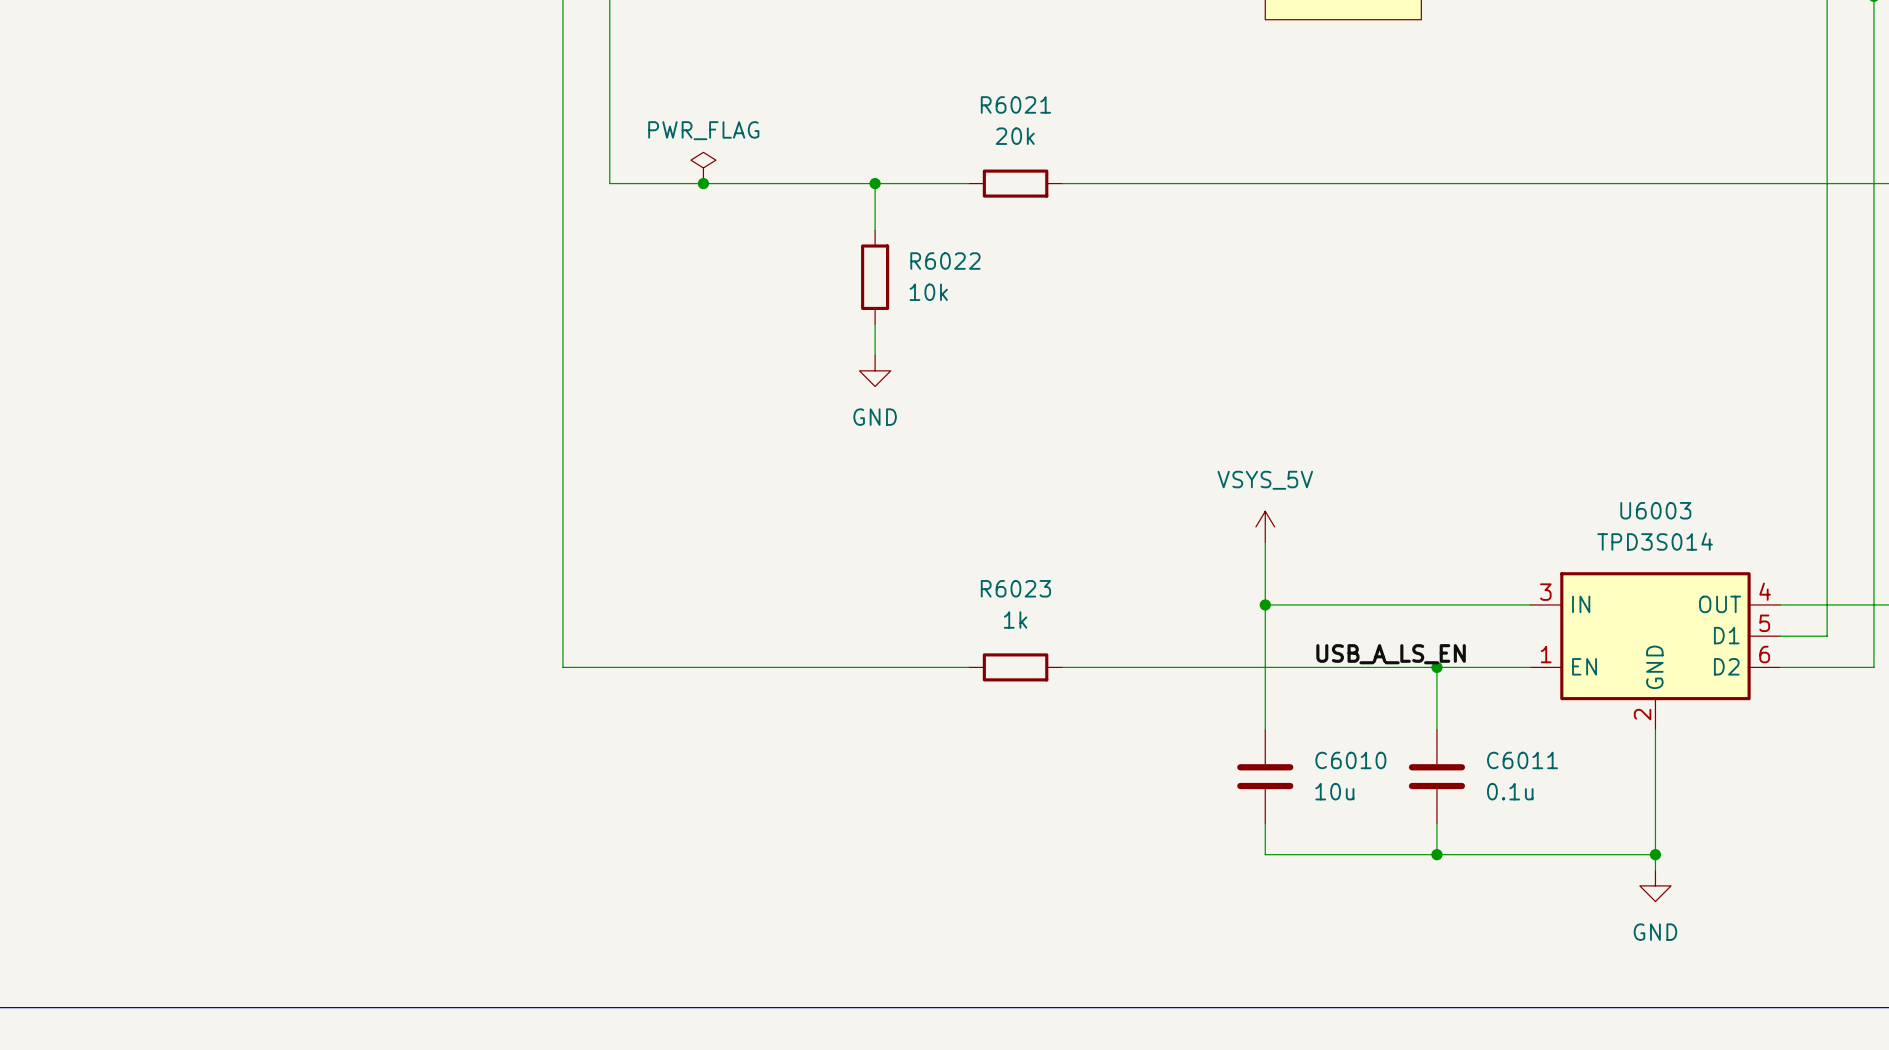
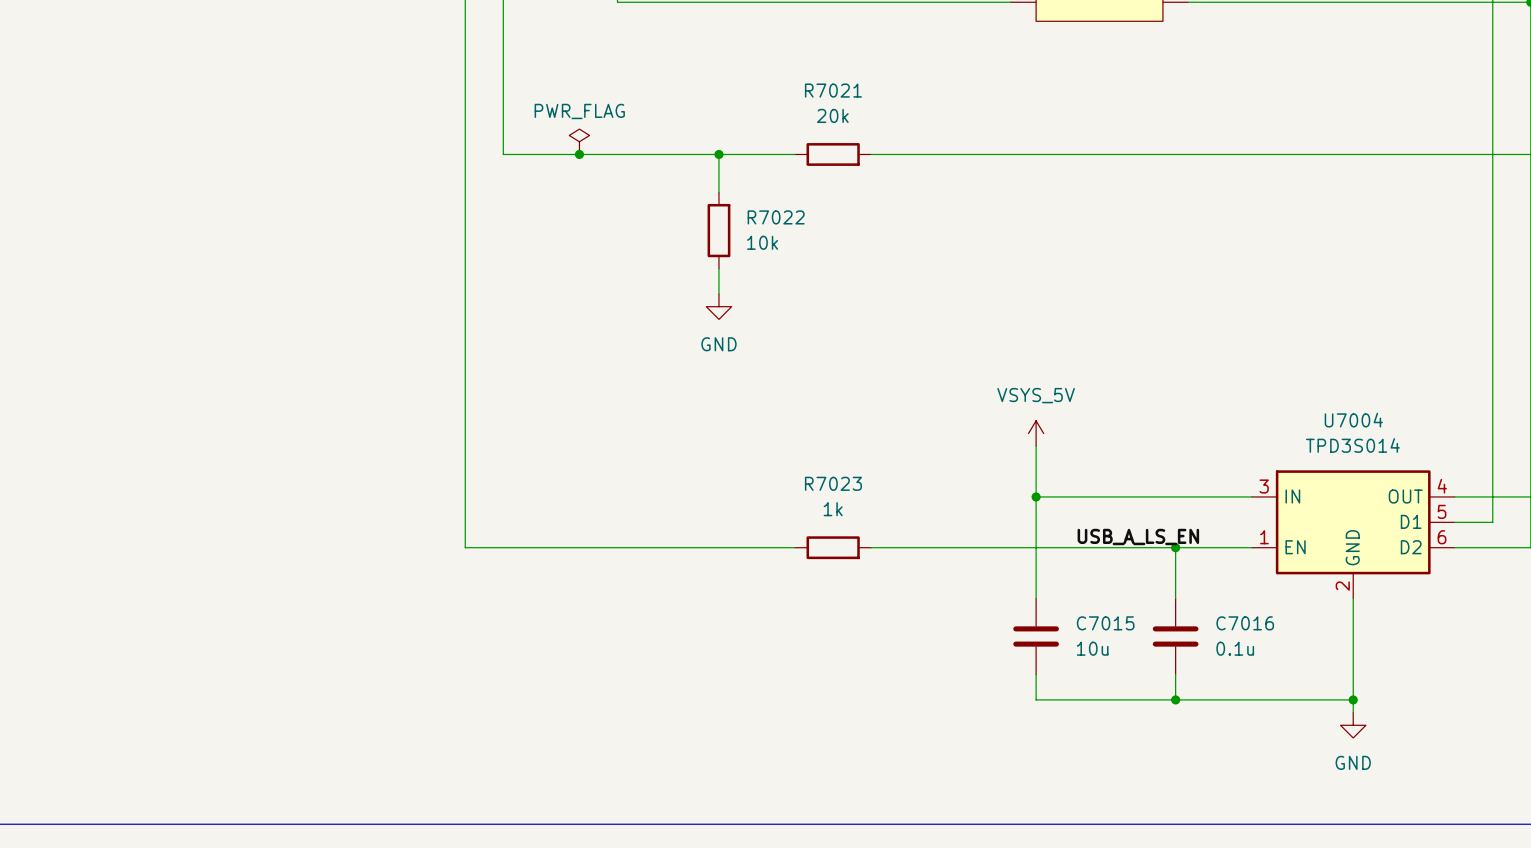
R6021 name: R6021 (1015, 104) -> R7021 (833, 90)
R6022 name: R6022 (945, 261) -> R7022 (776, 217)
U6003 name: U6003 (1655, 510) -> U7004 (1353, 420)
R6023 name: R6023 (1015, 588) -> R7023 (833, 483)
C6010 name: C6010 (1350, 760) -> C7015 (1105, 623)
C6011 name: C6011 (1522, 760) -> C7016 (1245, 623)

